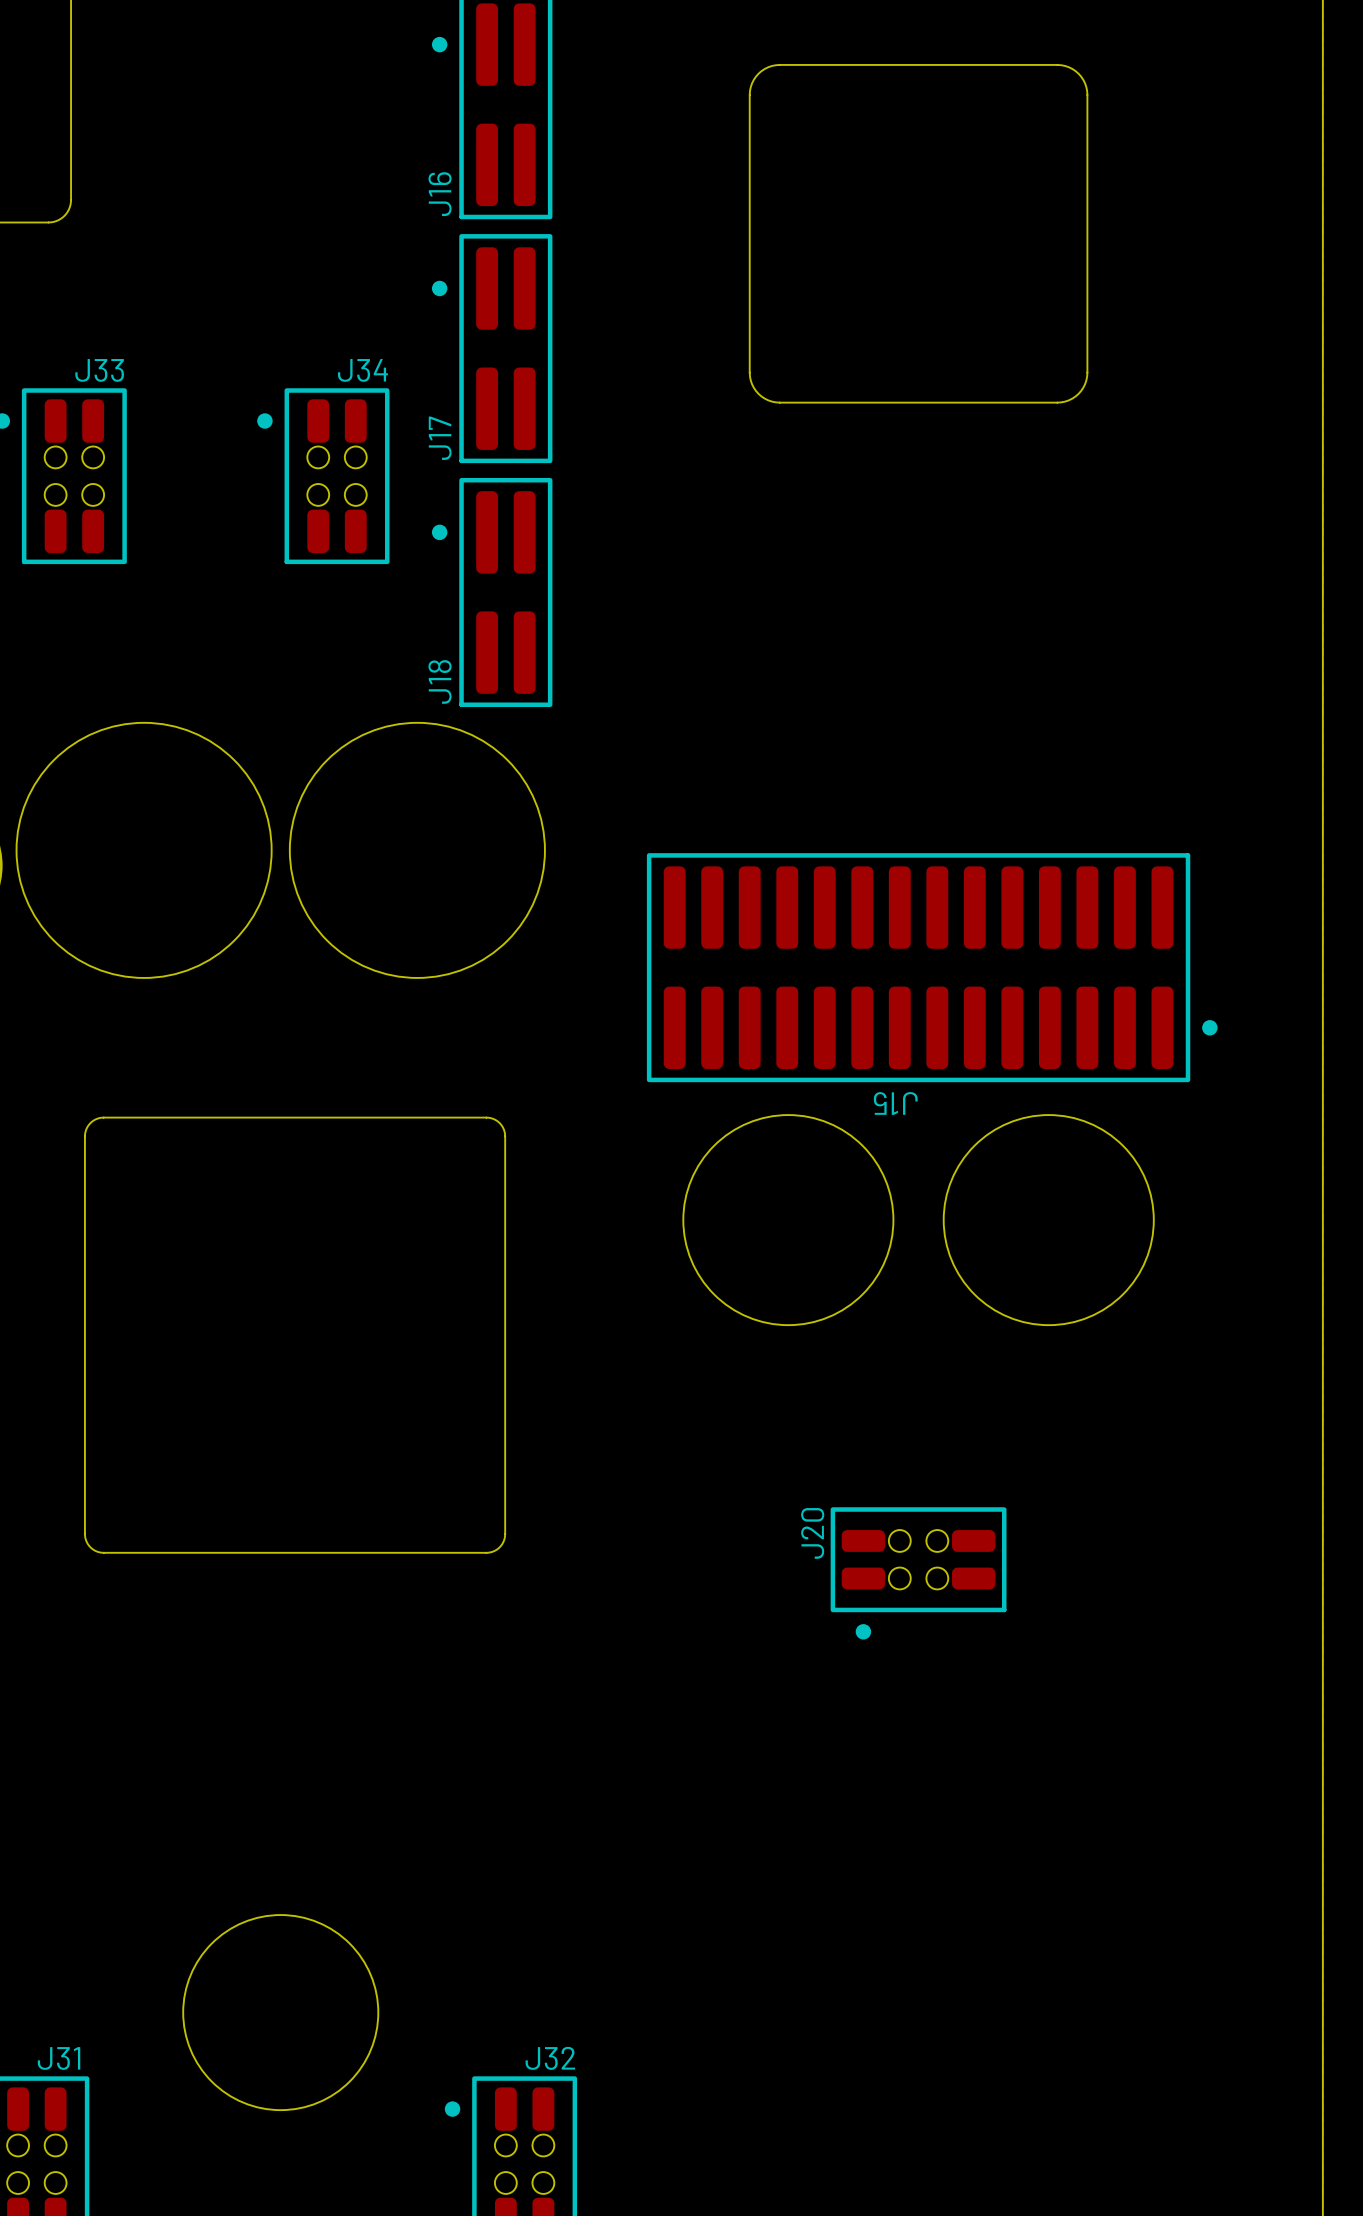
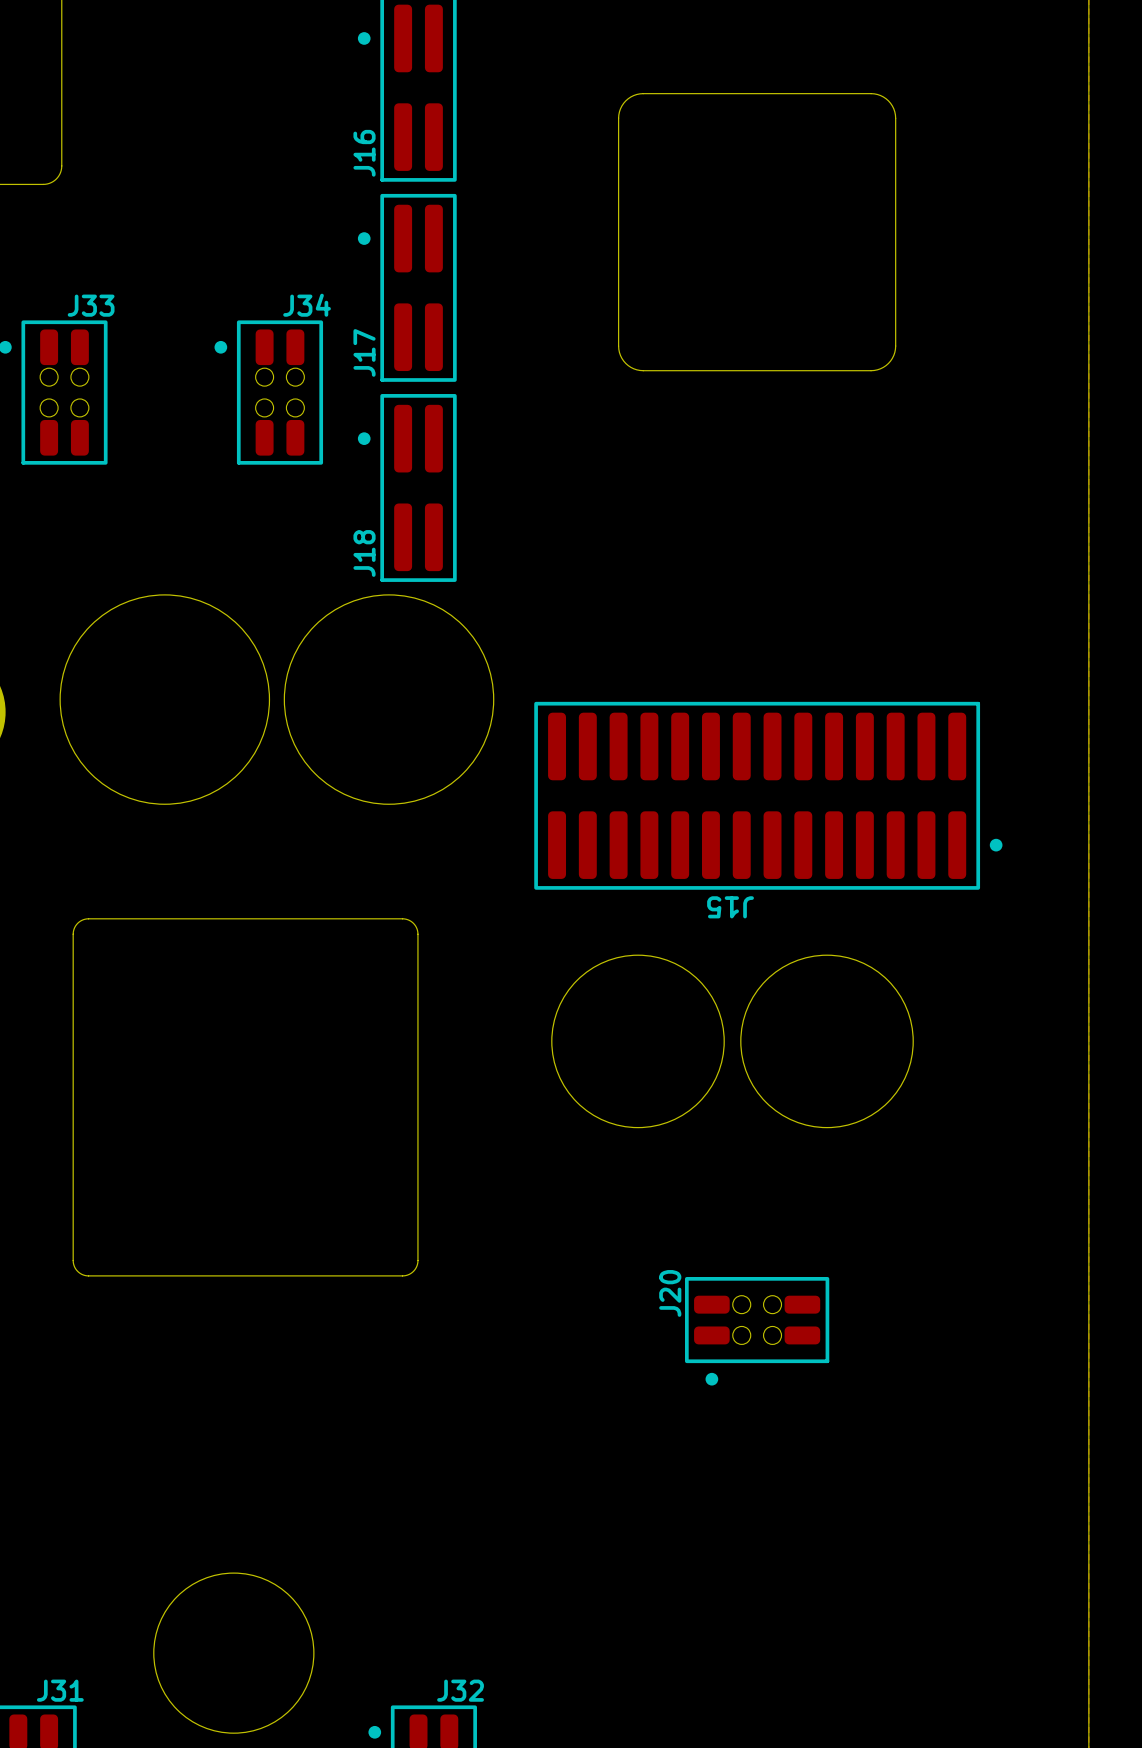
drawing: [682, 64, 1155, 1326] -> none
drawing: none -> [551, 93, 914, 1129]
drawing: [15, 722, 546, 2111] -> none
drawing: none -> [59, 594, 495, 1734]
J20 position: (918, 1573) -> (757, 1331)

